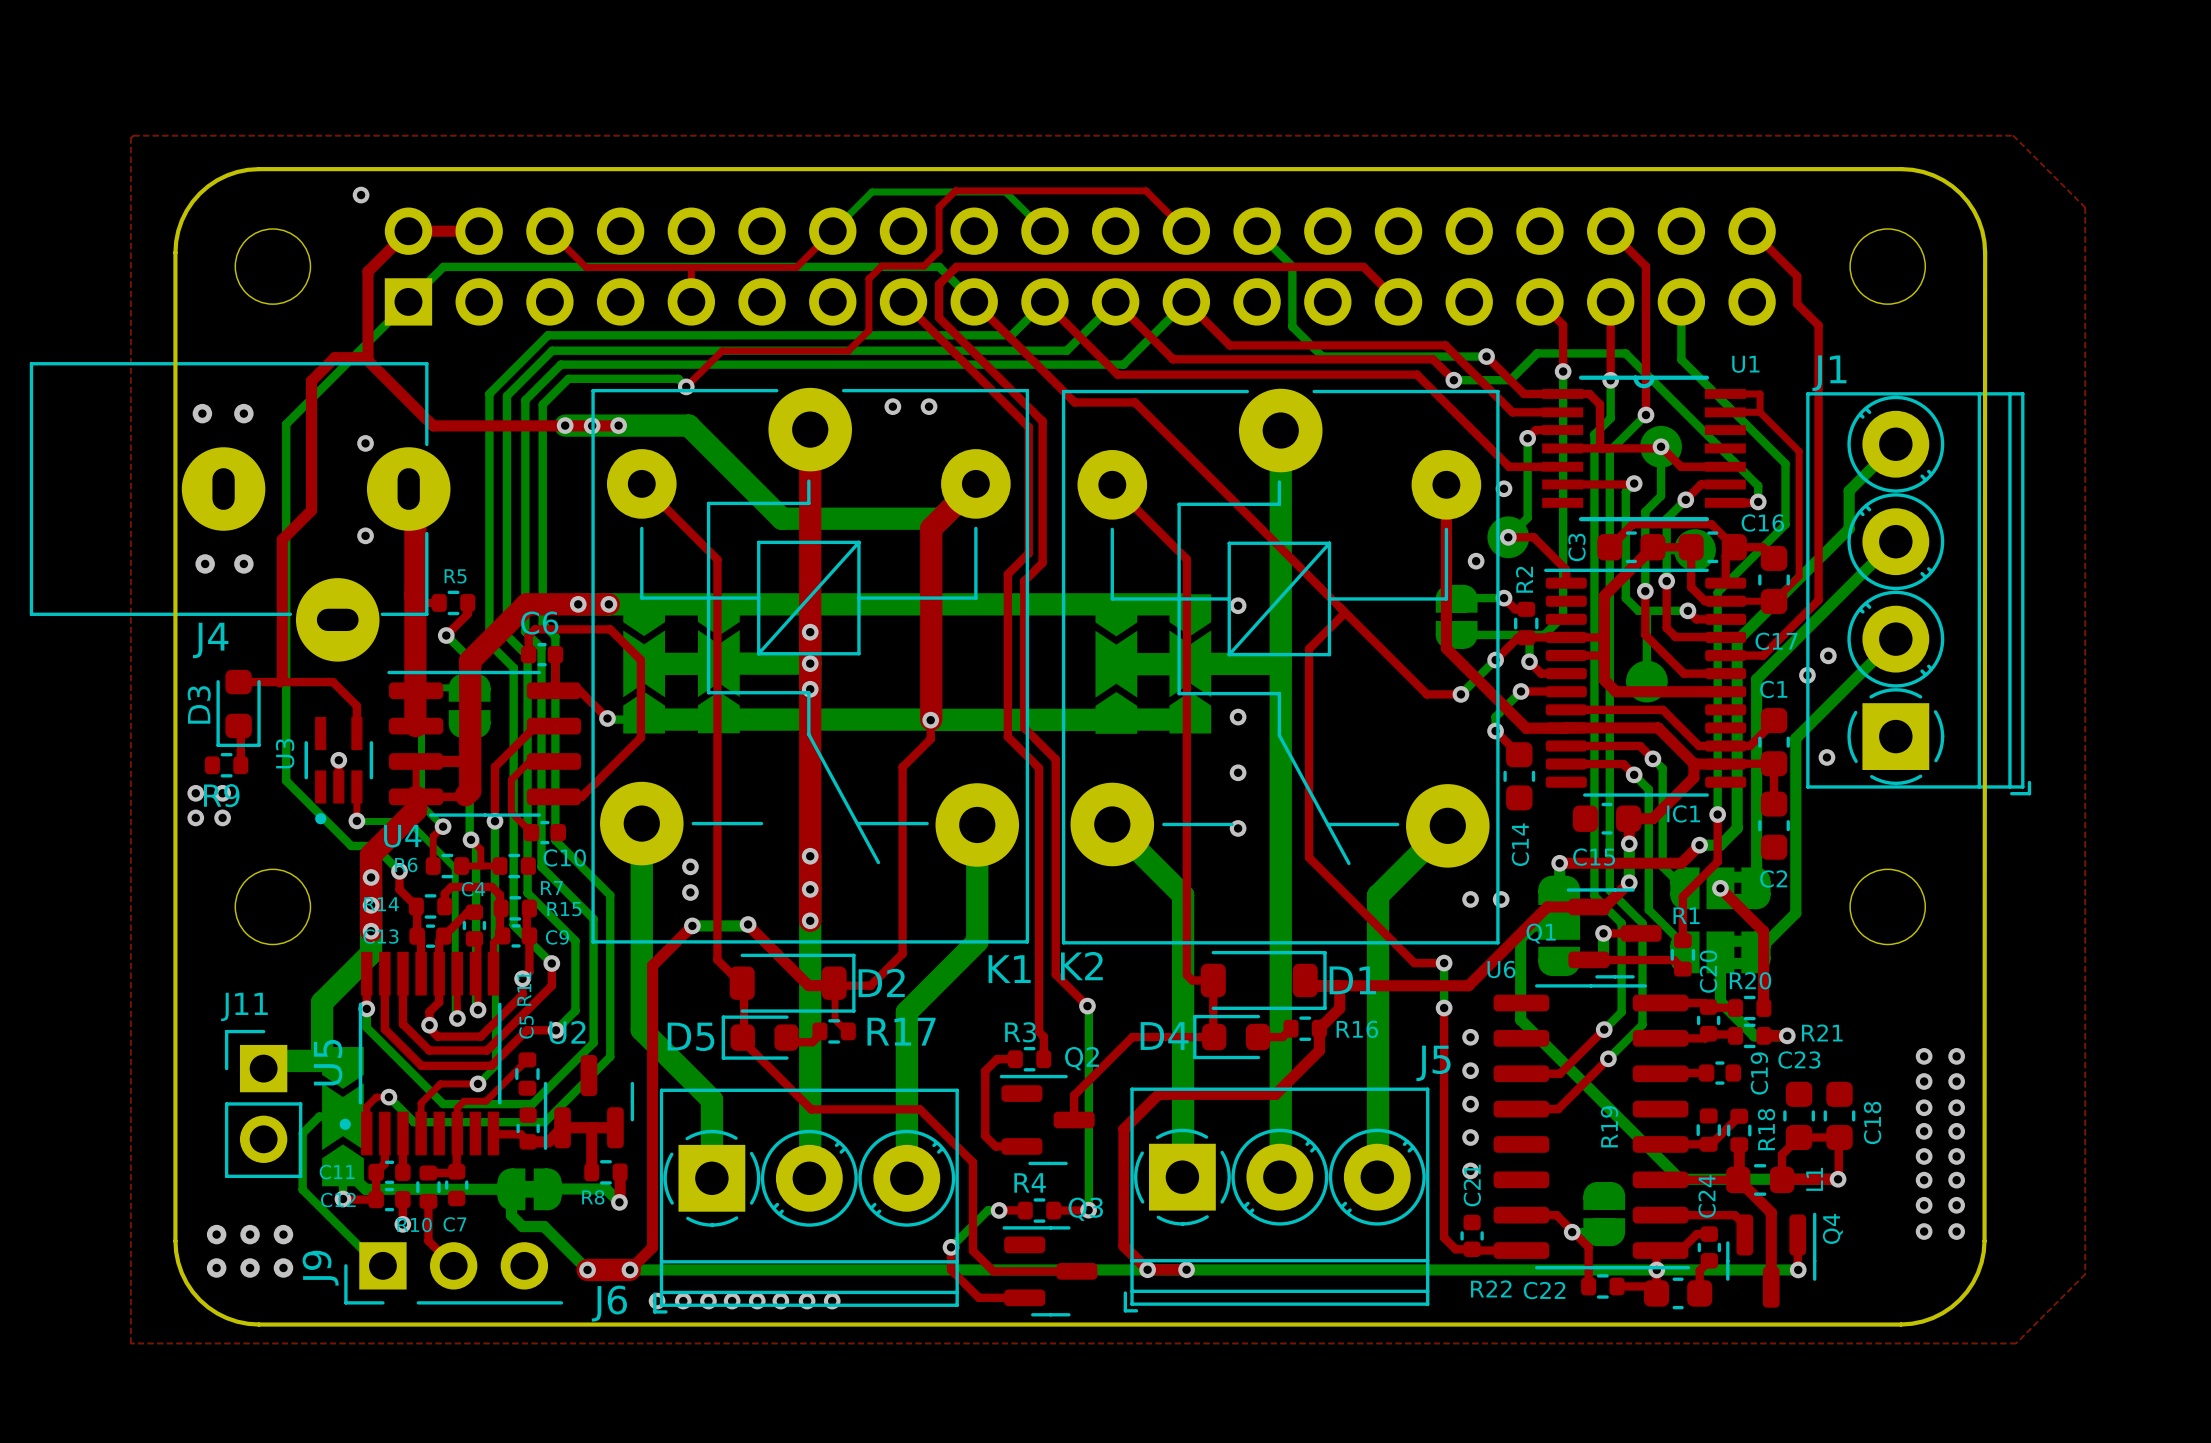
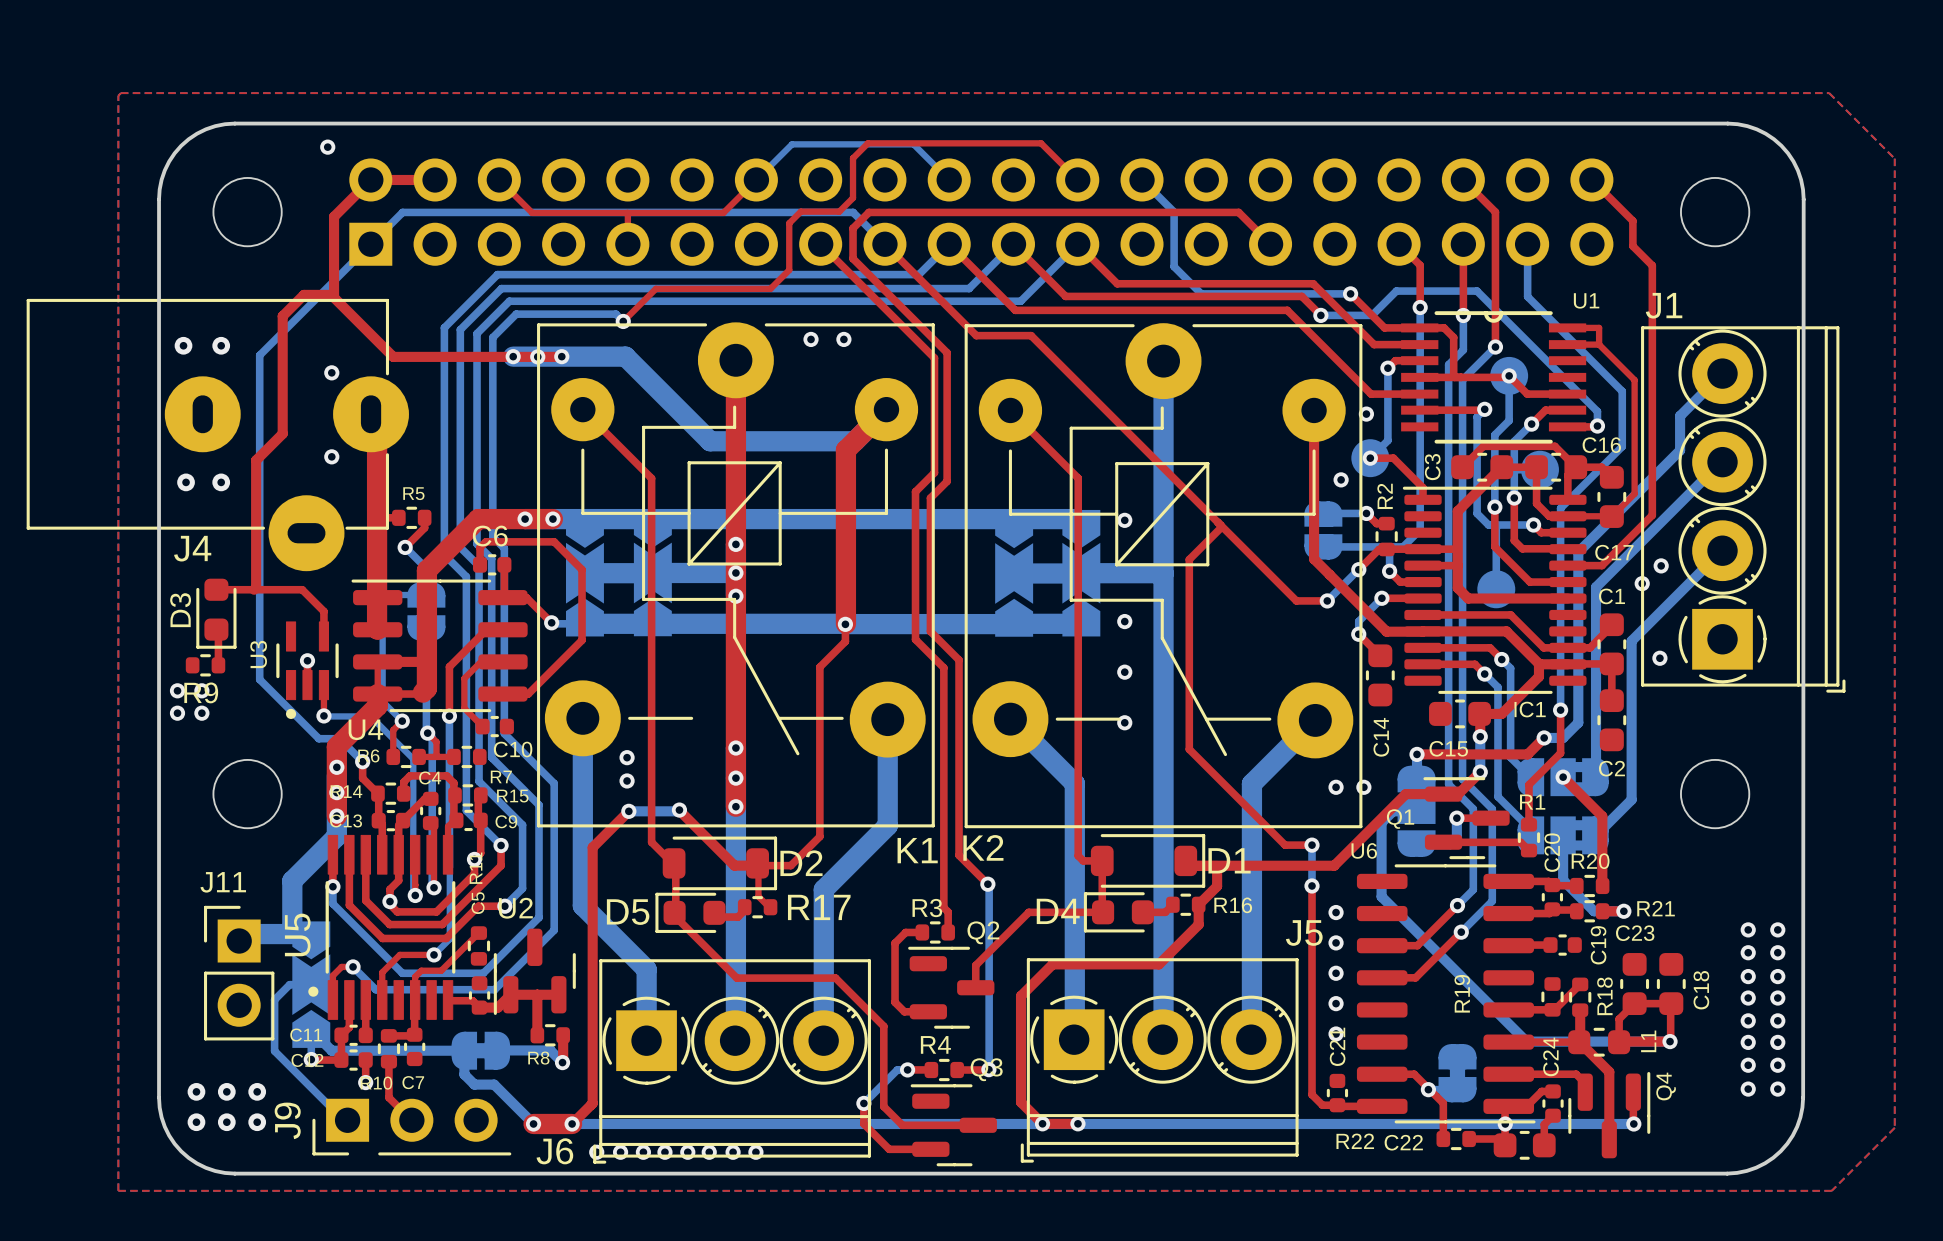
part footprint: [1583, 1182, 1626, 1247] -> [1438, 1044, 1477, 1103]

